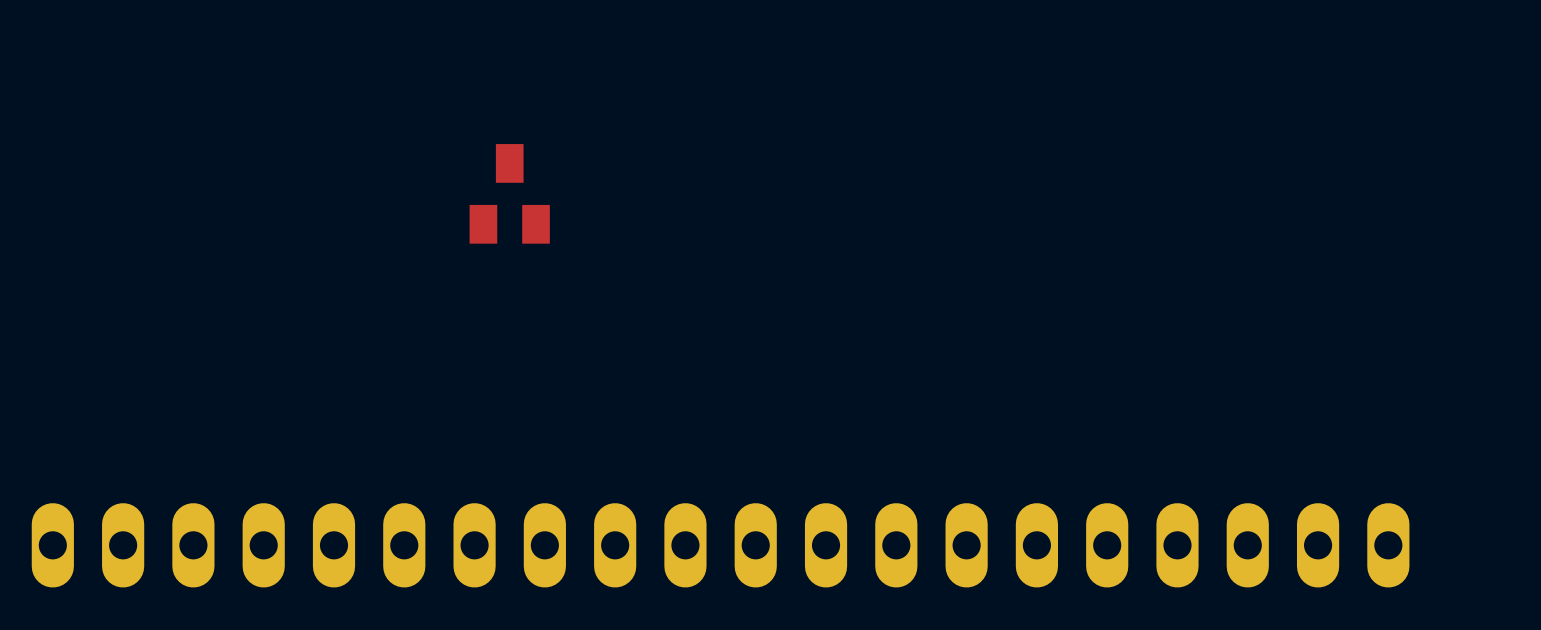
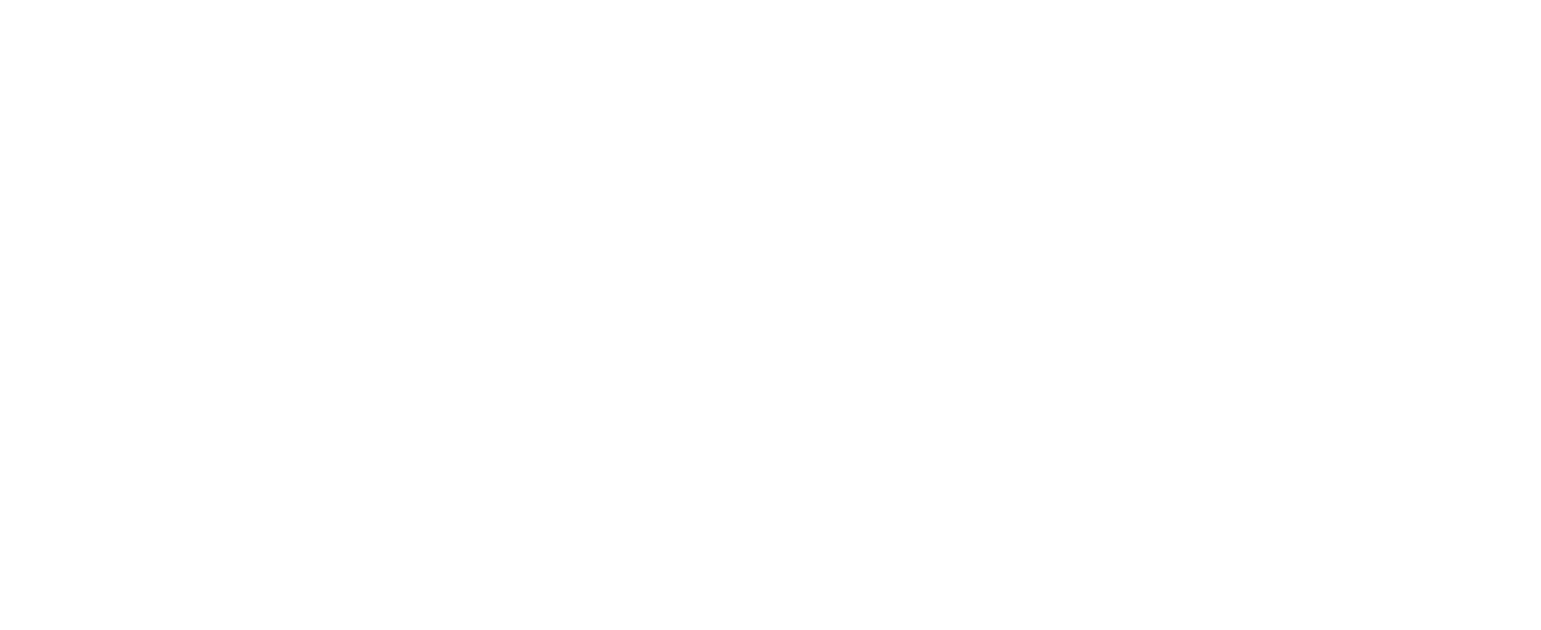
part: (509, 193) -> none
part: (720, 545) -> none

